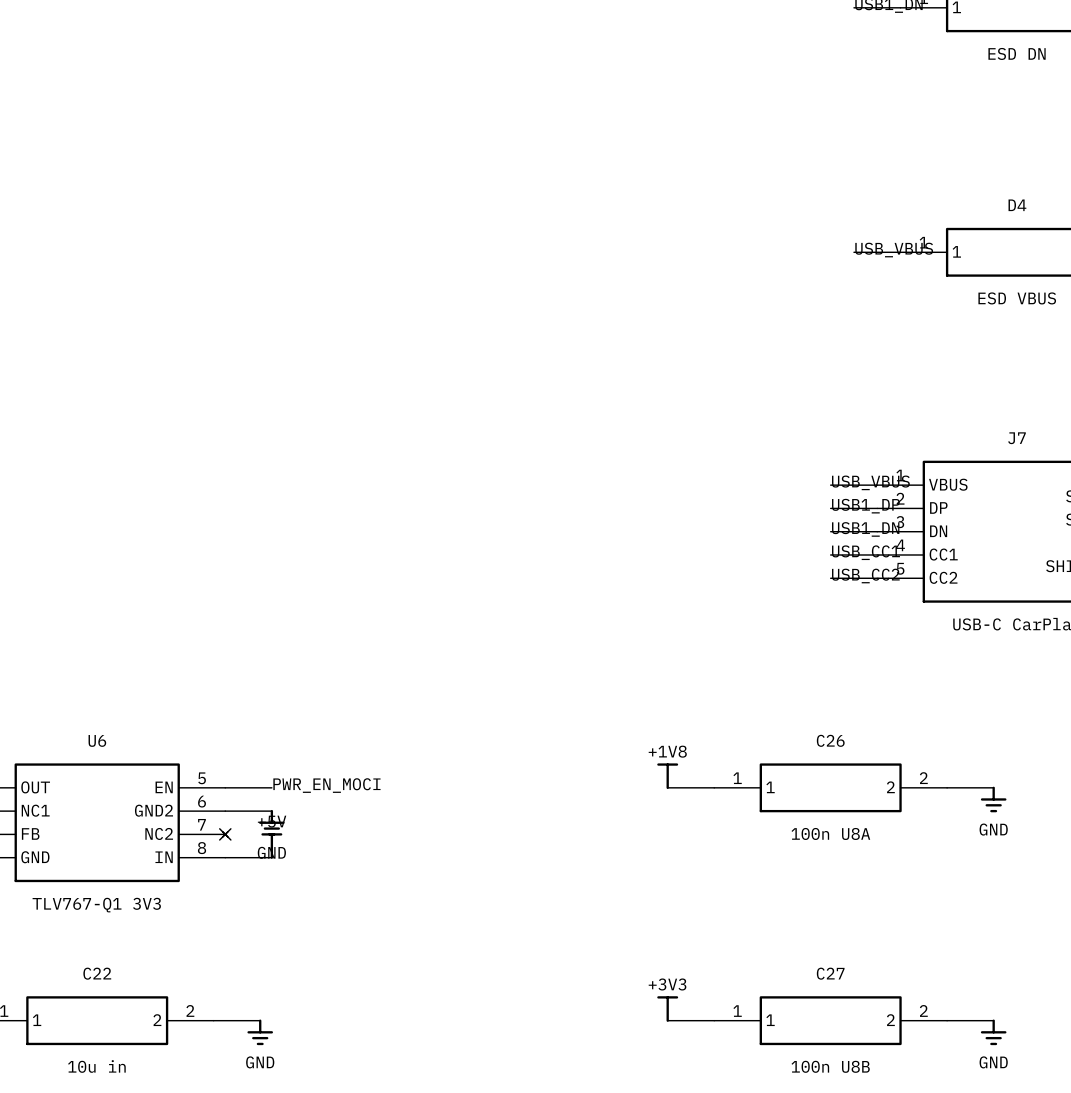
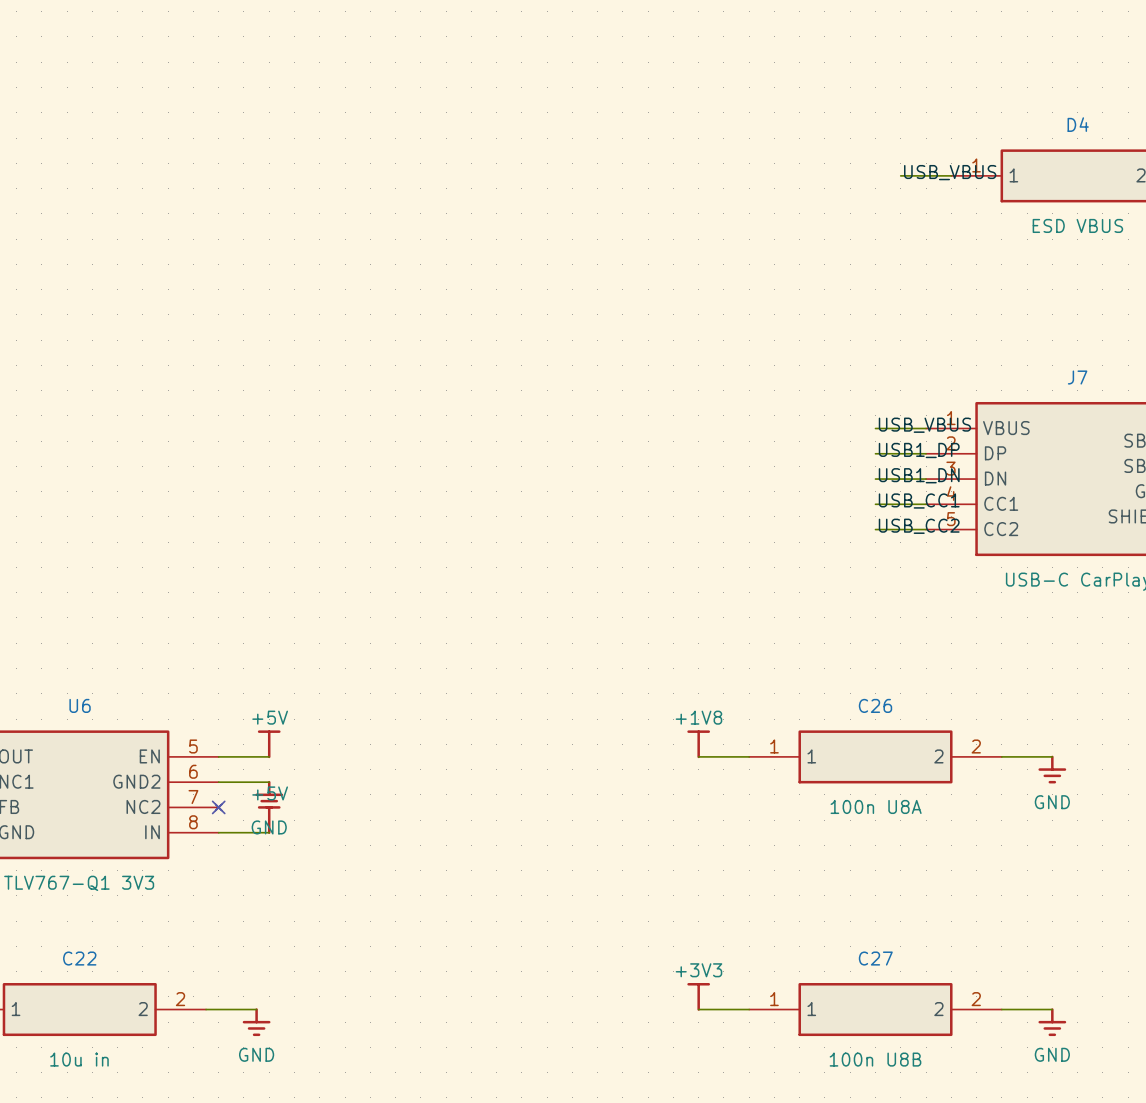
power symbol: none -> +5V (269, 744)
label: PWR_EN_MOCI (326, 785) -> none

